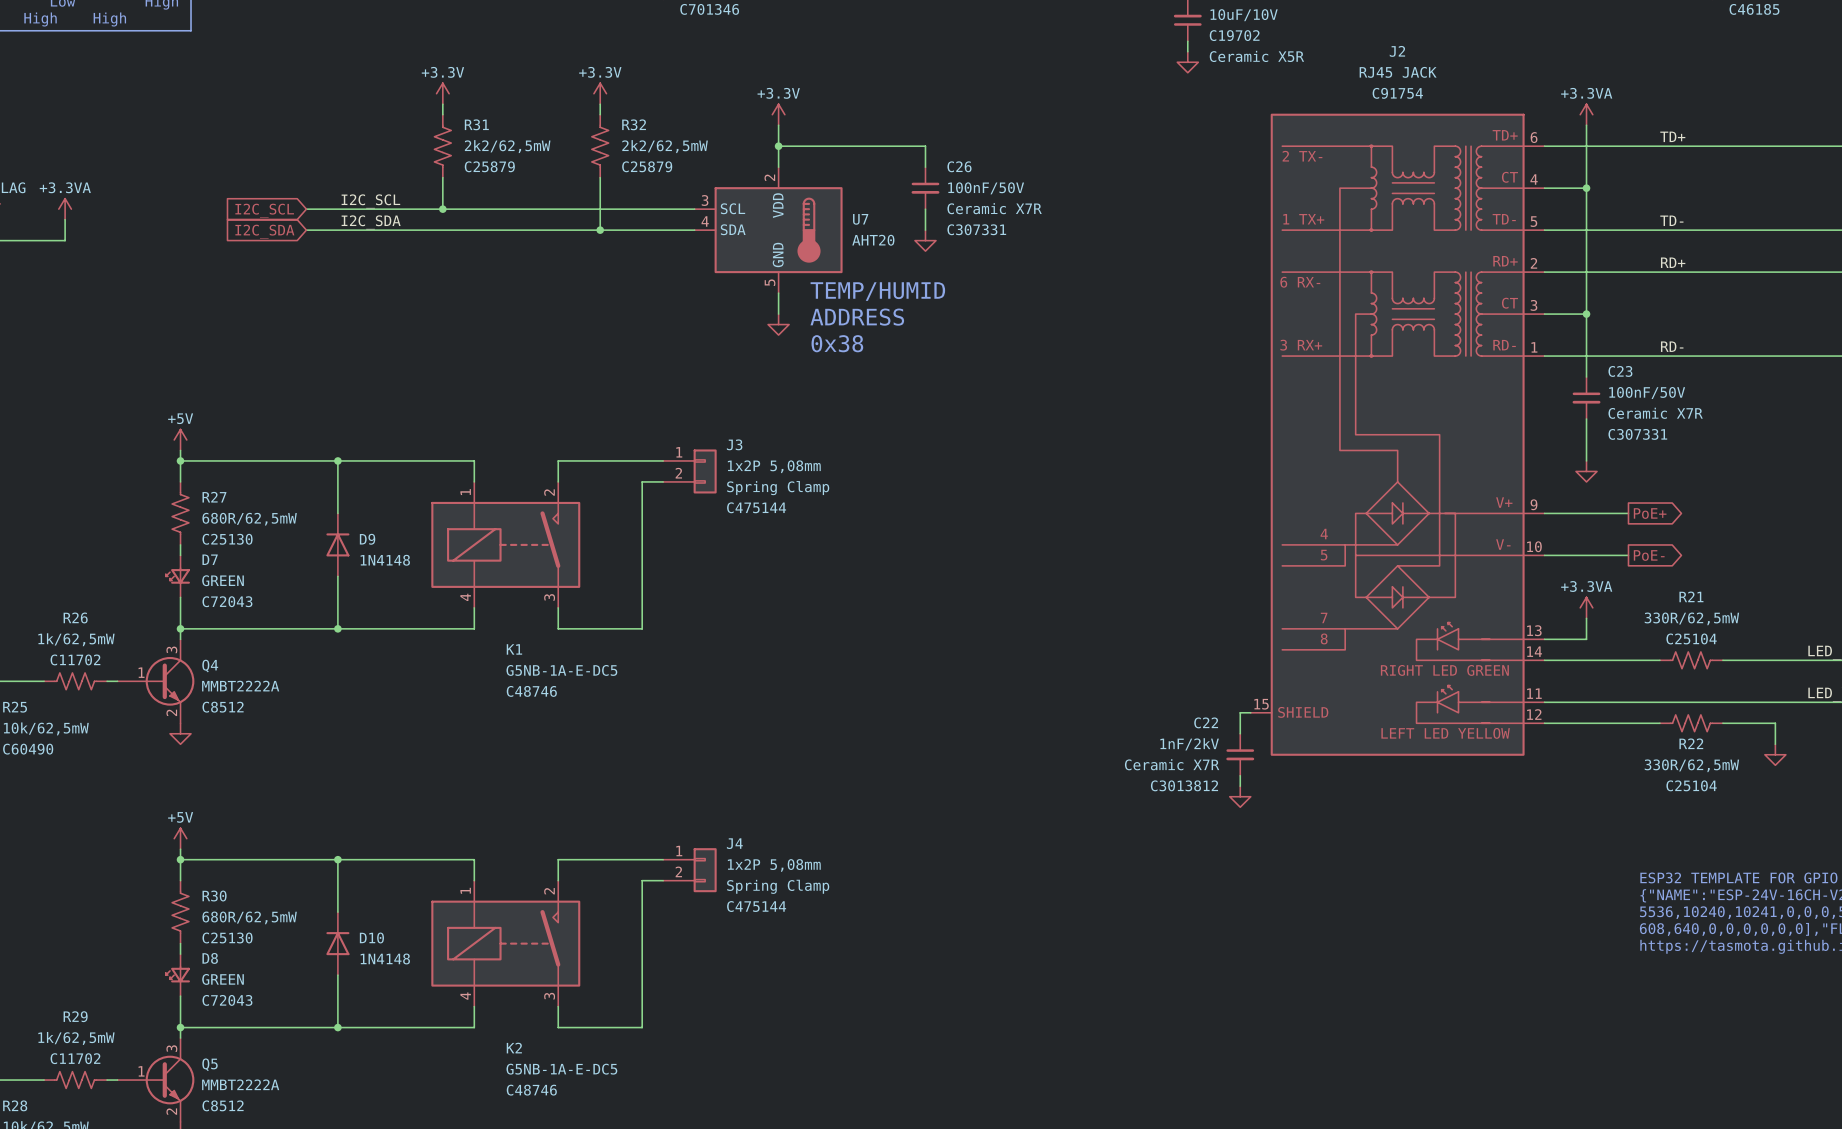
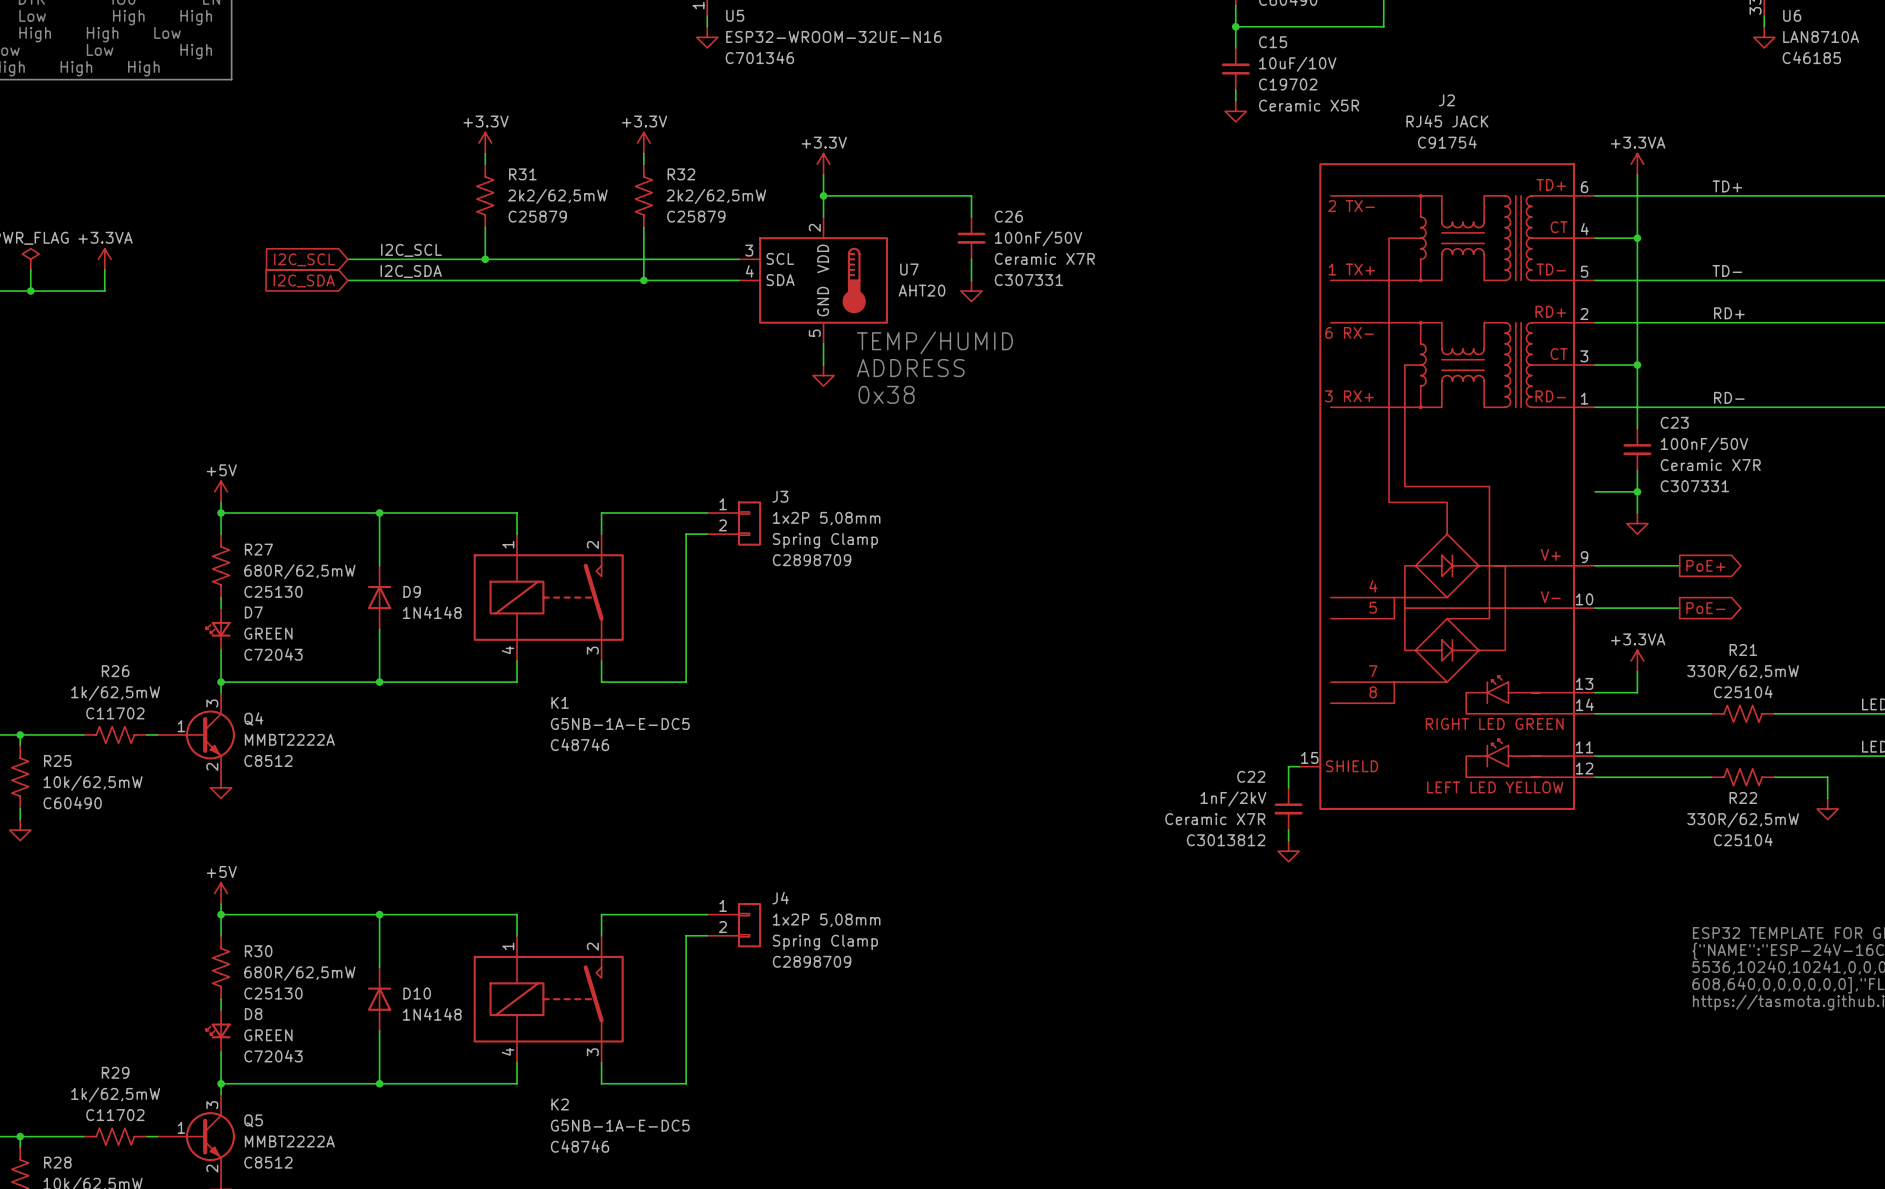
wire: none -> (1595, 491) (1637, 491)
junction: none -> (1637, 491)
J3 text: C475144 (756, 507) -> C2898709 (812, 560)
J4 text: C475144 (756, 906) -> C2898709 (812, 961)

